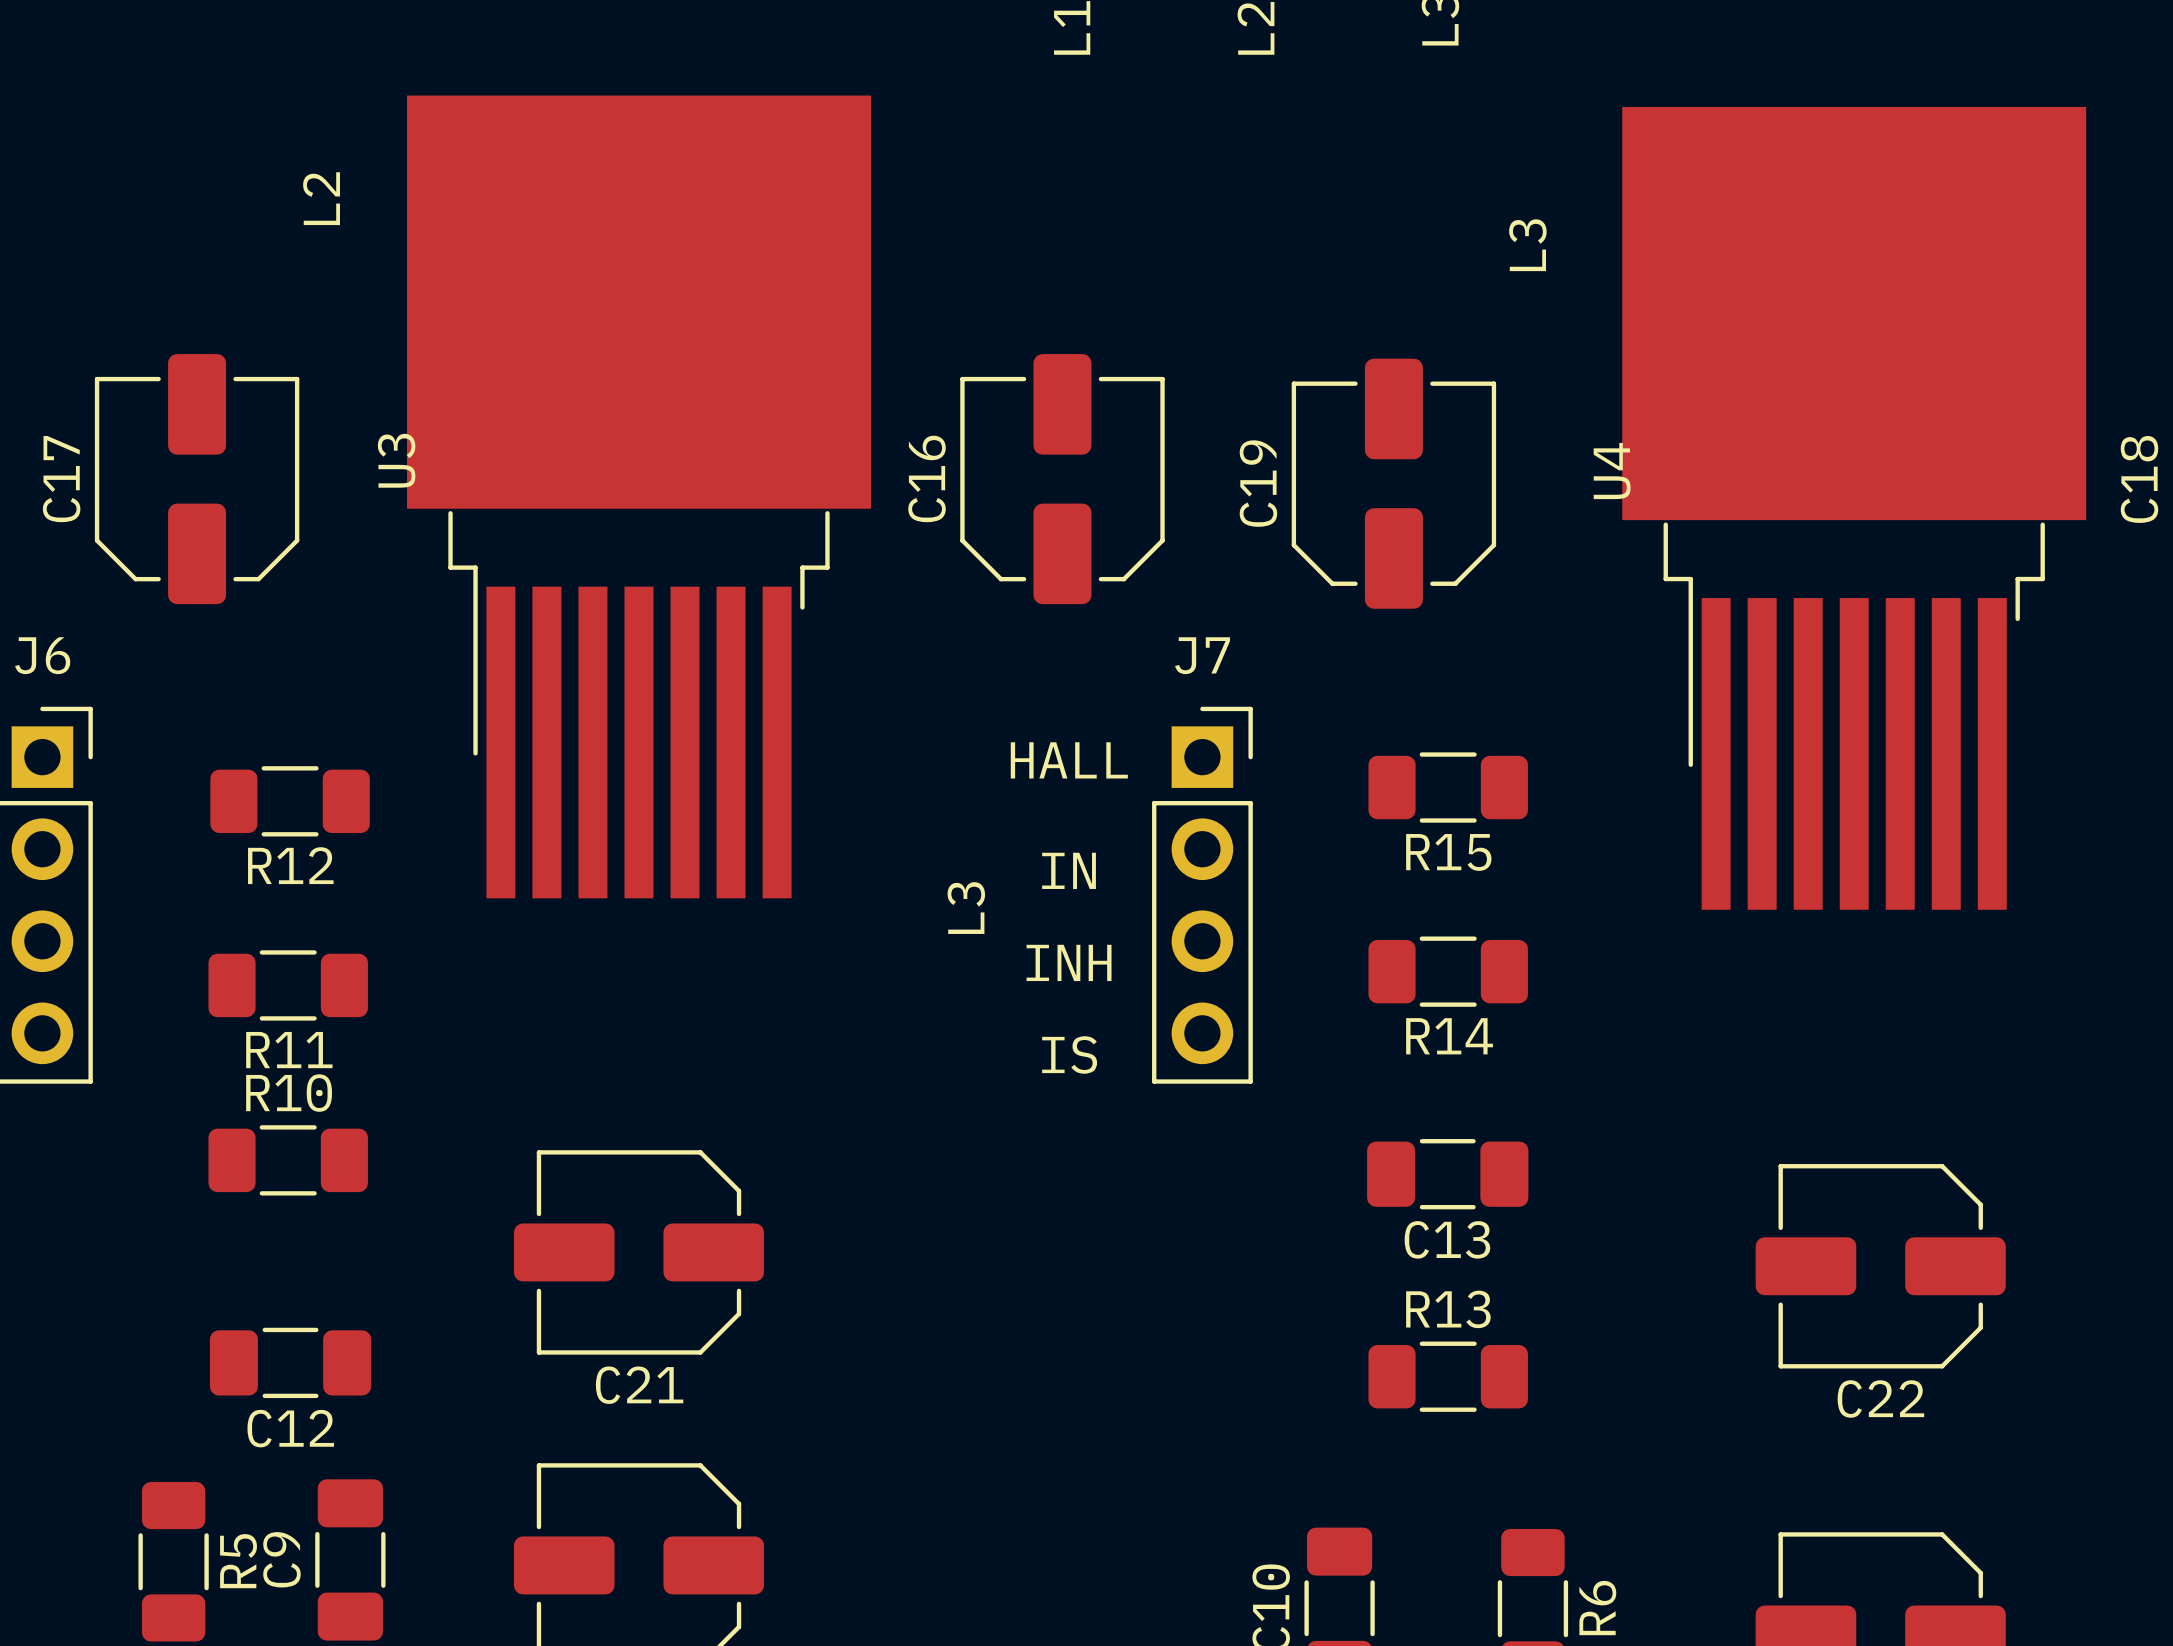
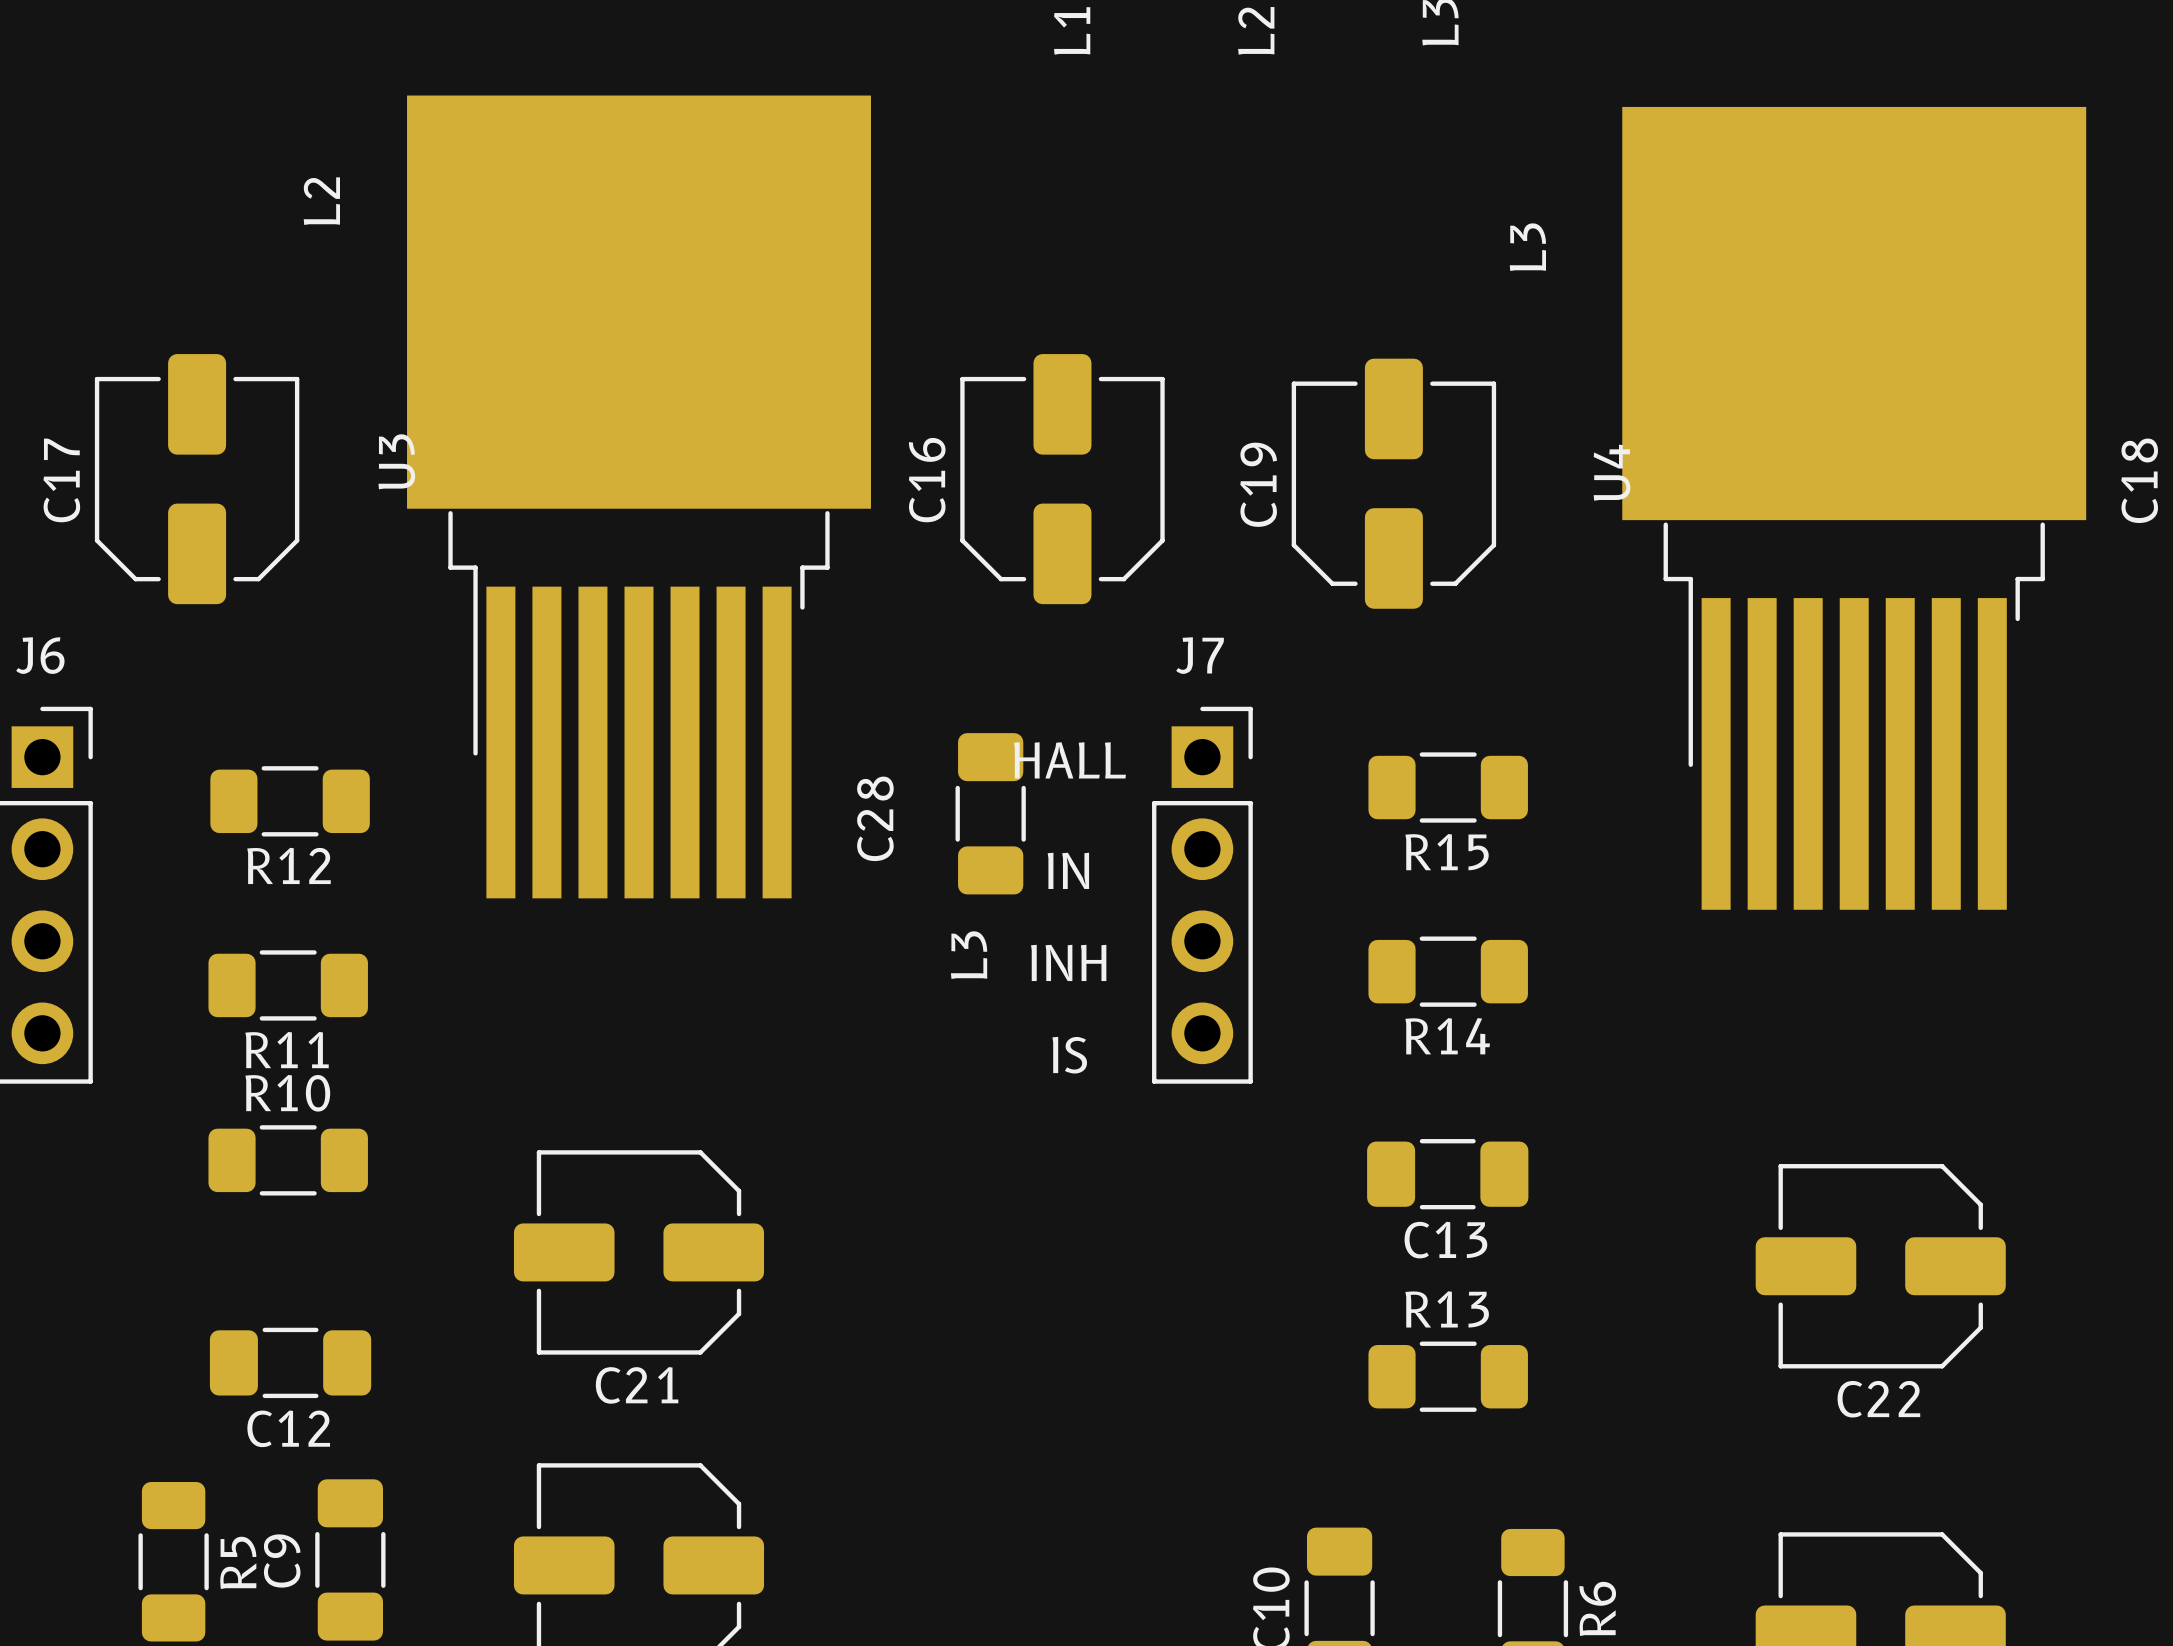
C28: none -> (990, 813)
text position: L3 (966, 908) -> L3 (969, 955)

